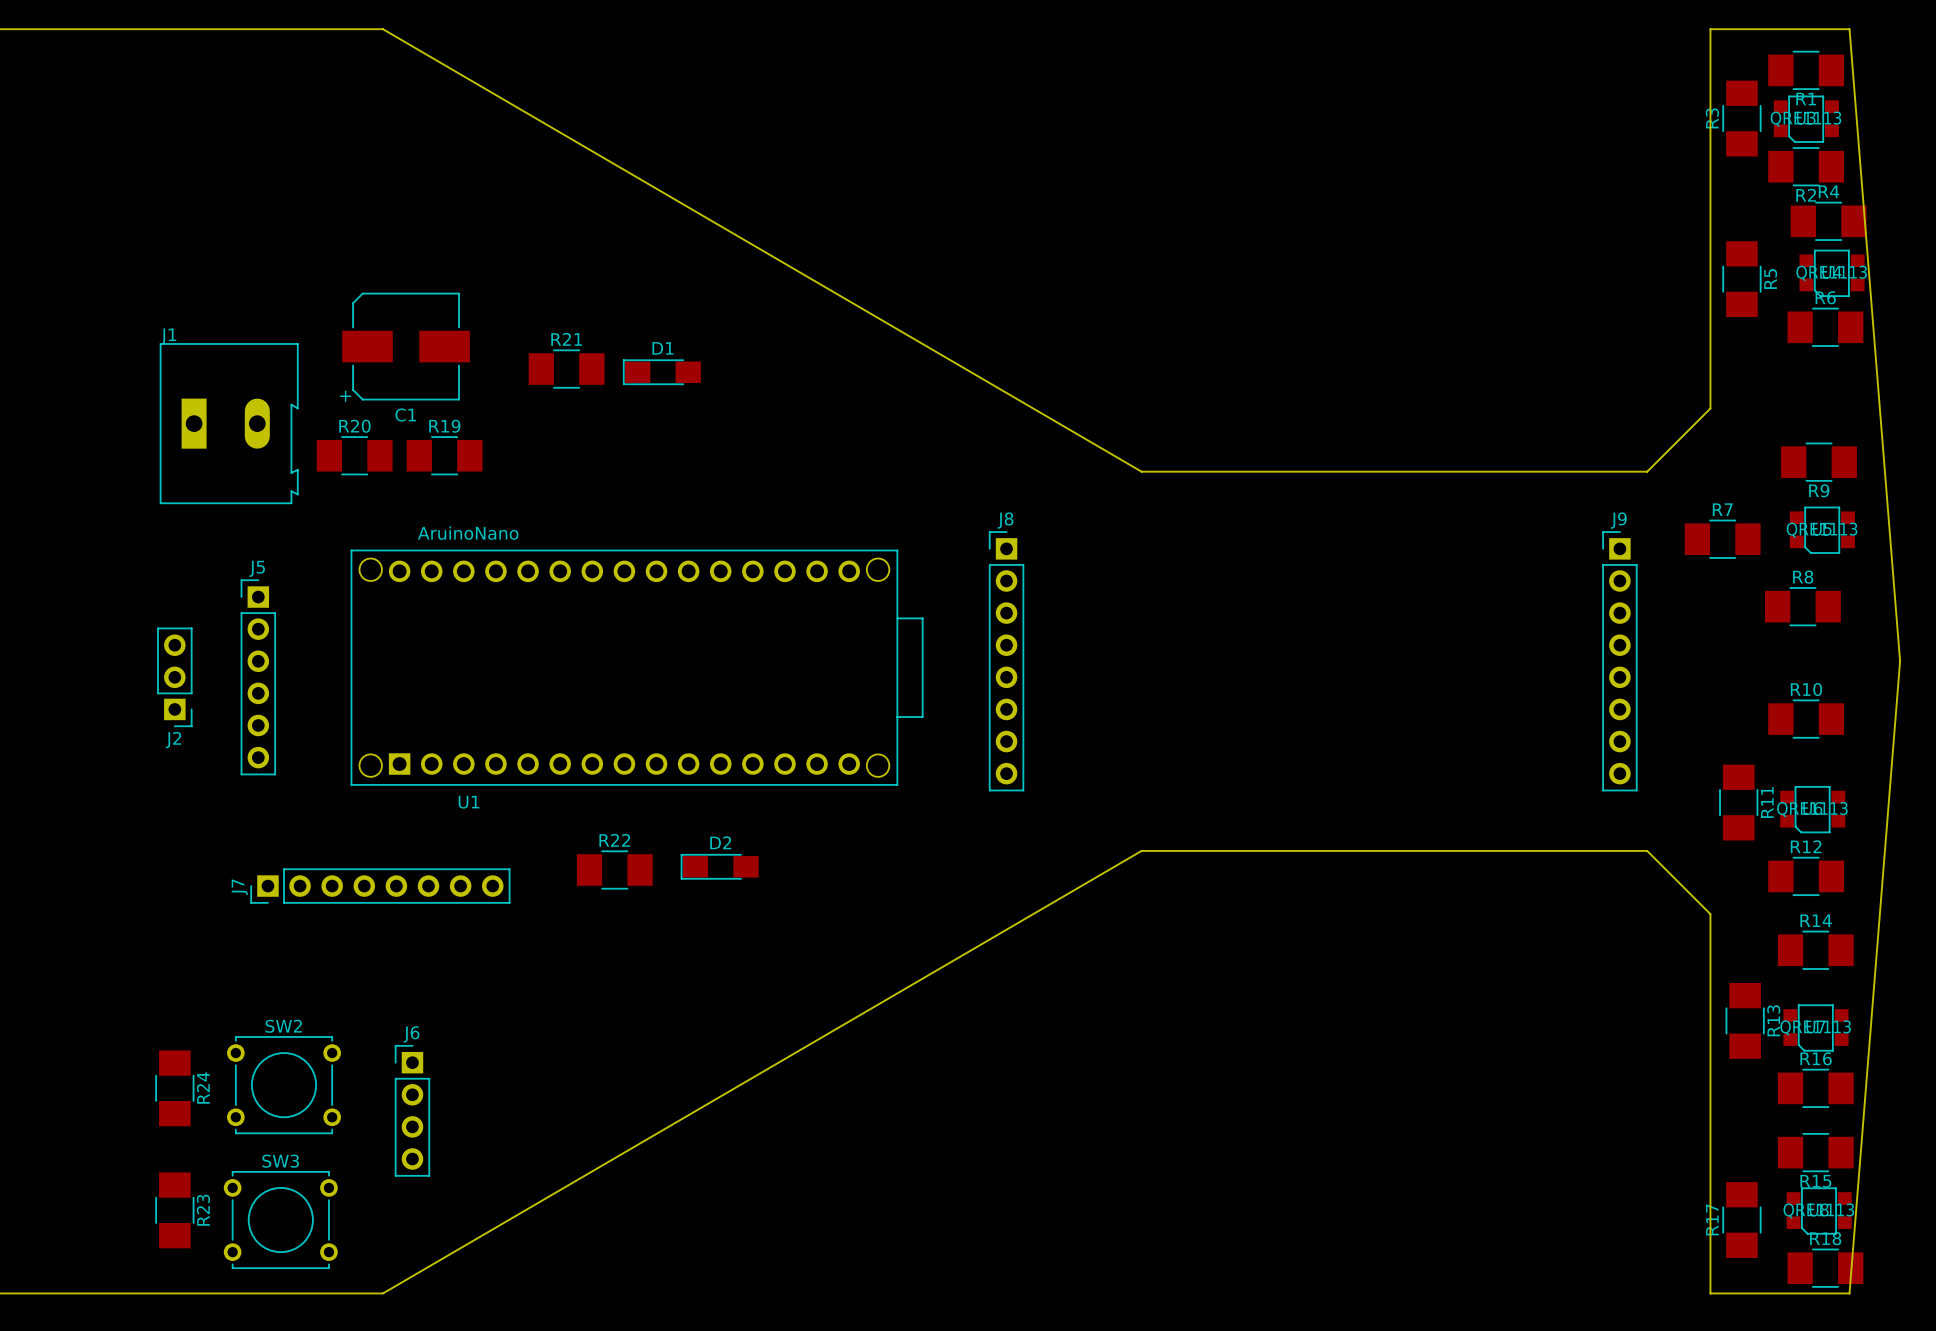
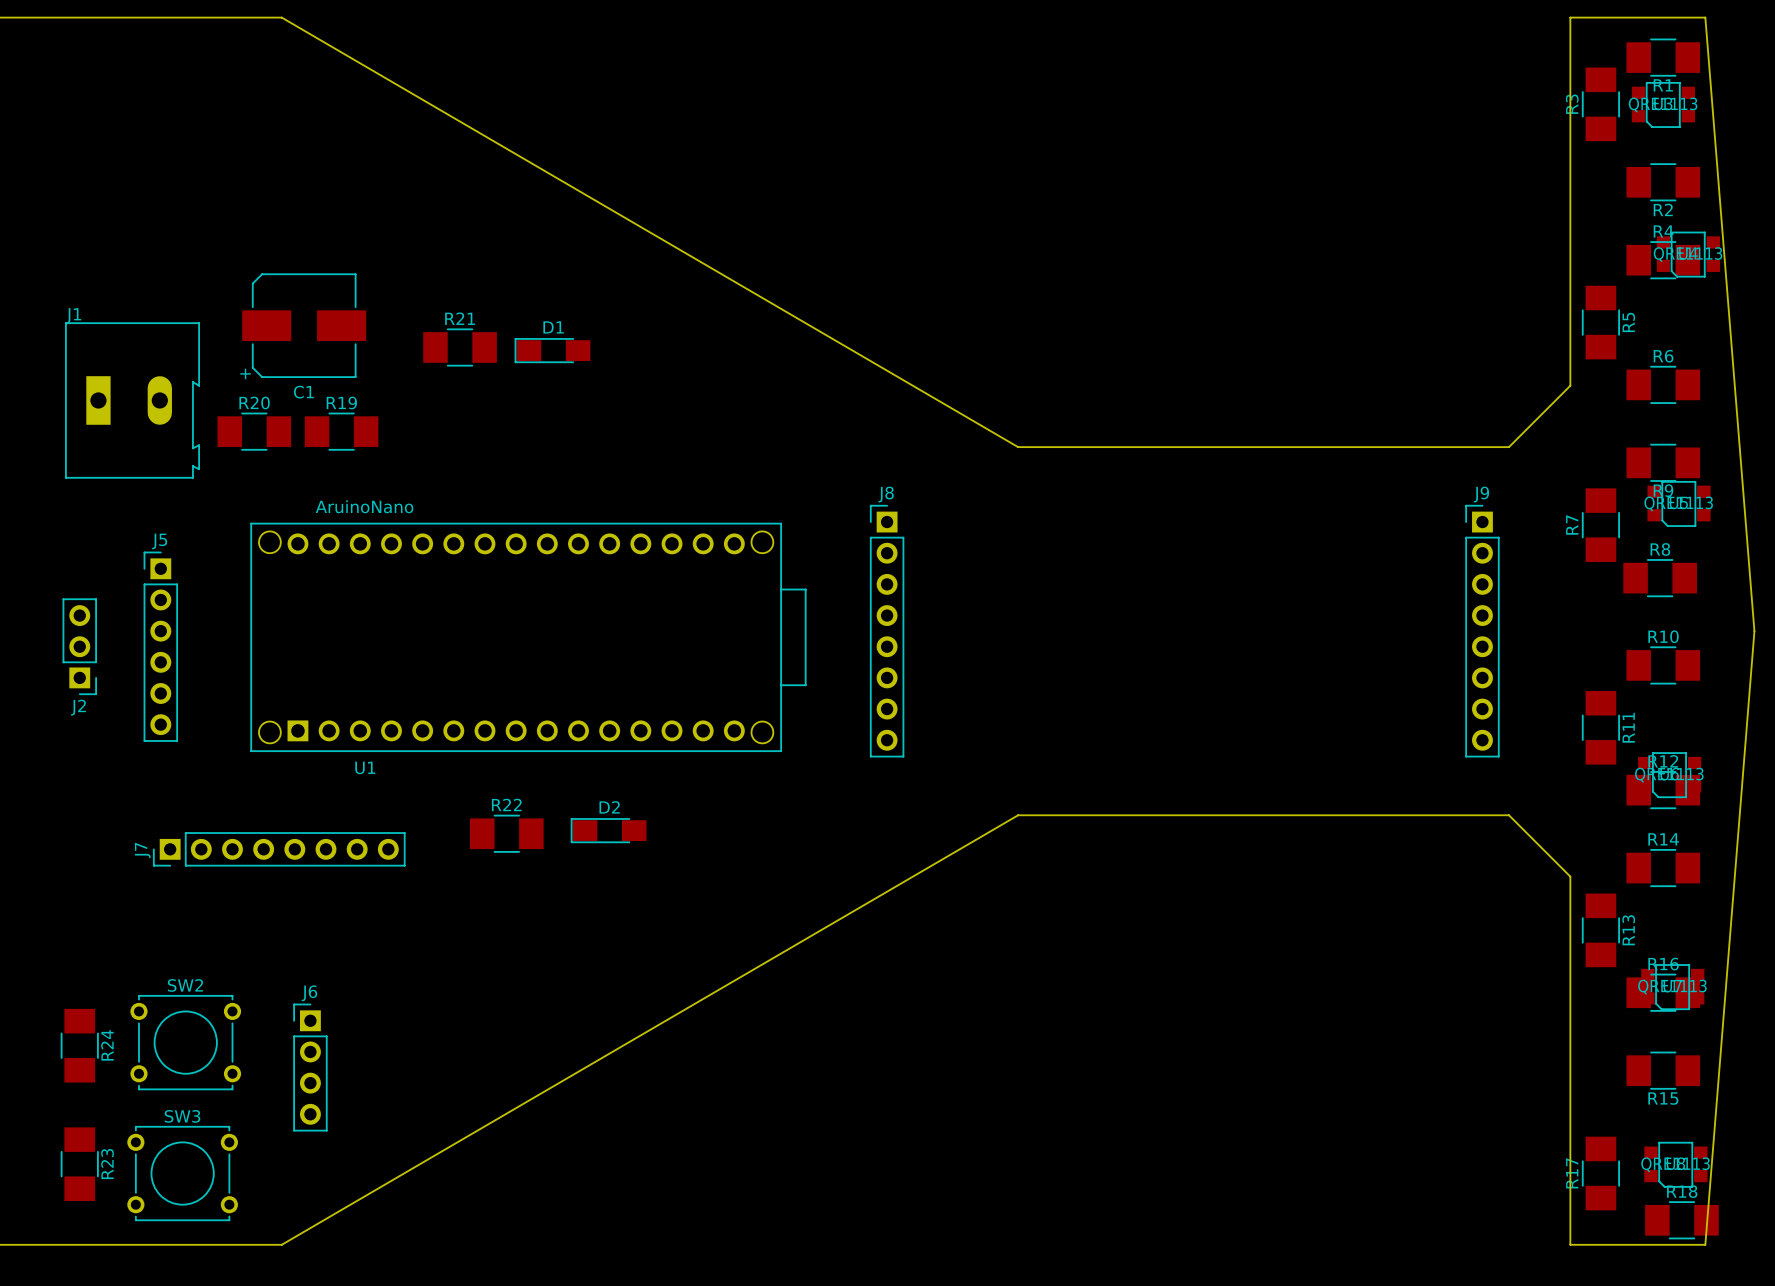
R2 position: (1806, 166) -> (1663, 182)
R4 position: (1828, 221) -> (1663, 260)
R5 position: (1741, 279) -> (1600, 322)
R6 position: (1825, 327) -> (1663, 384)
R9 position: (1819, 462) -> (1663, 462)
R7 name position: R7 (1722, 509) -> R7 (1572, 525)
R7 rotation: 0° (1722, 539) -> 90° clockwise (1600, 525)
R10 position: (1806, 719) -> (1663, 665)
R11 position: (1738, 802) -> (1600, 727)
R12 position: (1806, 876) -> (1663, 790)
R14 position: (1815, 950) -> (1663, 868)
R13 position: (1745, 1020) -> (1600, 930)
R16 position: (1815, 1088) -> (1663, 992)
R15 position: (1815, 1152) -> (1663, 1070)

